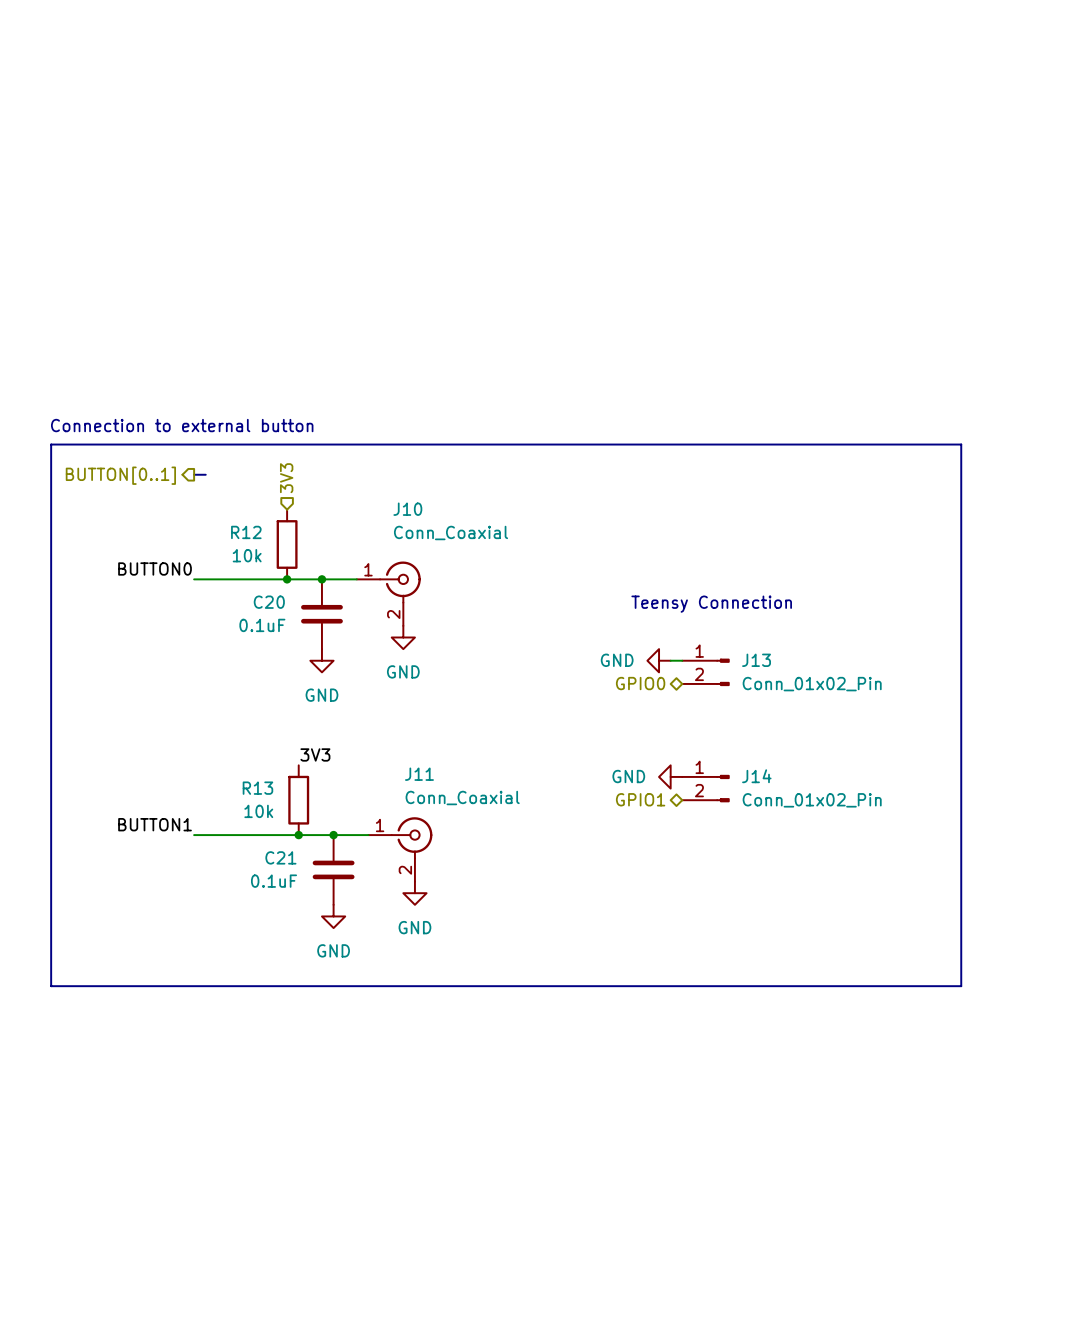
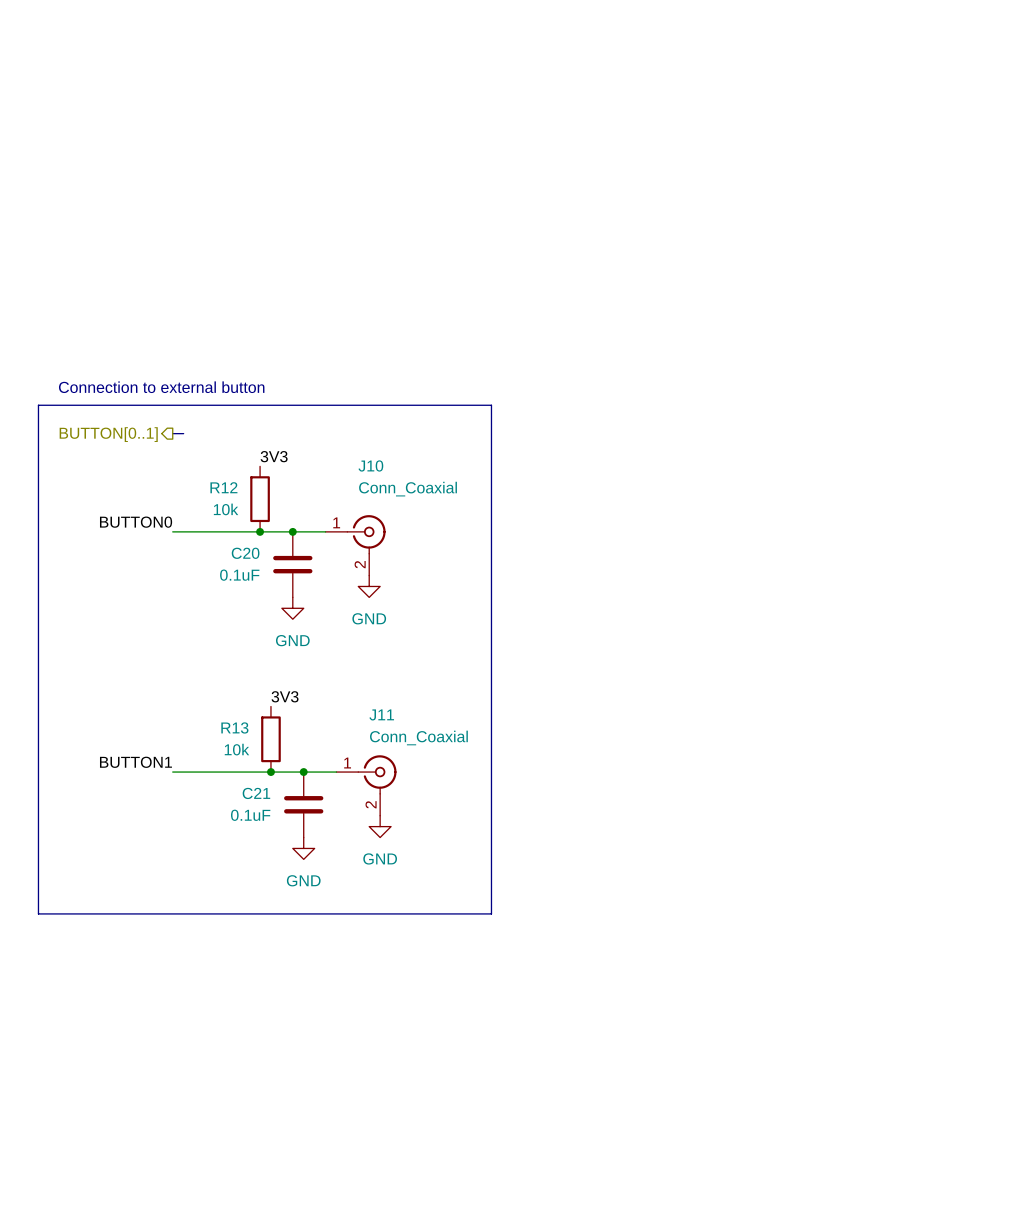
line: (533, 444) (961, 444) (961, 986) (533, 986) -> (491, 405) (491, 913)
hierarchical label: 3V3 (286, 478) -> none
label: none -> 3V3 (274, 456)
text: Teensy Connection (711, 604) -> none
power symbol: GND (659, 660) -> none
wire: (670, 660) (682, 660) -> none
J13: Conn_01x02_Pin (705, 672) -> none
hierarchical label: GPIO0 (640, 683) -> none
power symbol: GND (670, 776) -> none
J14: Conn_01x02_Pin (705, 788) -> none
hierarchical label: GPIO1 (640, 799) -> none

